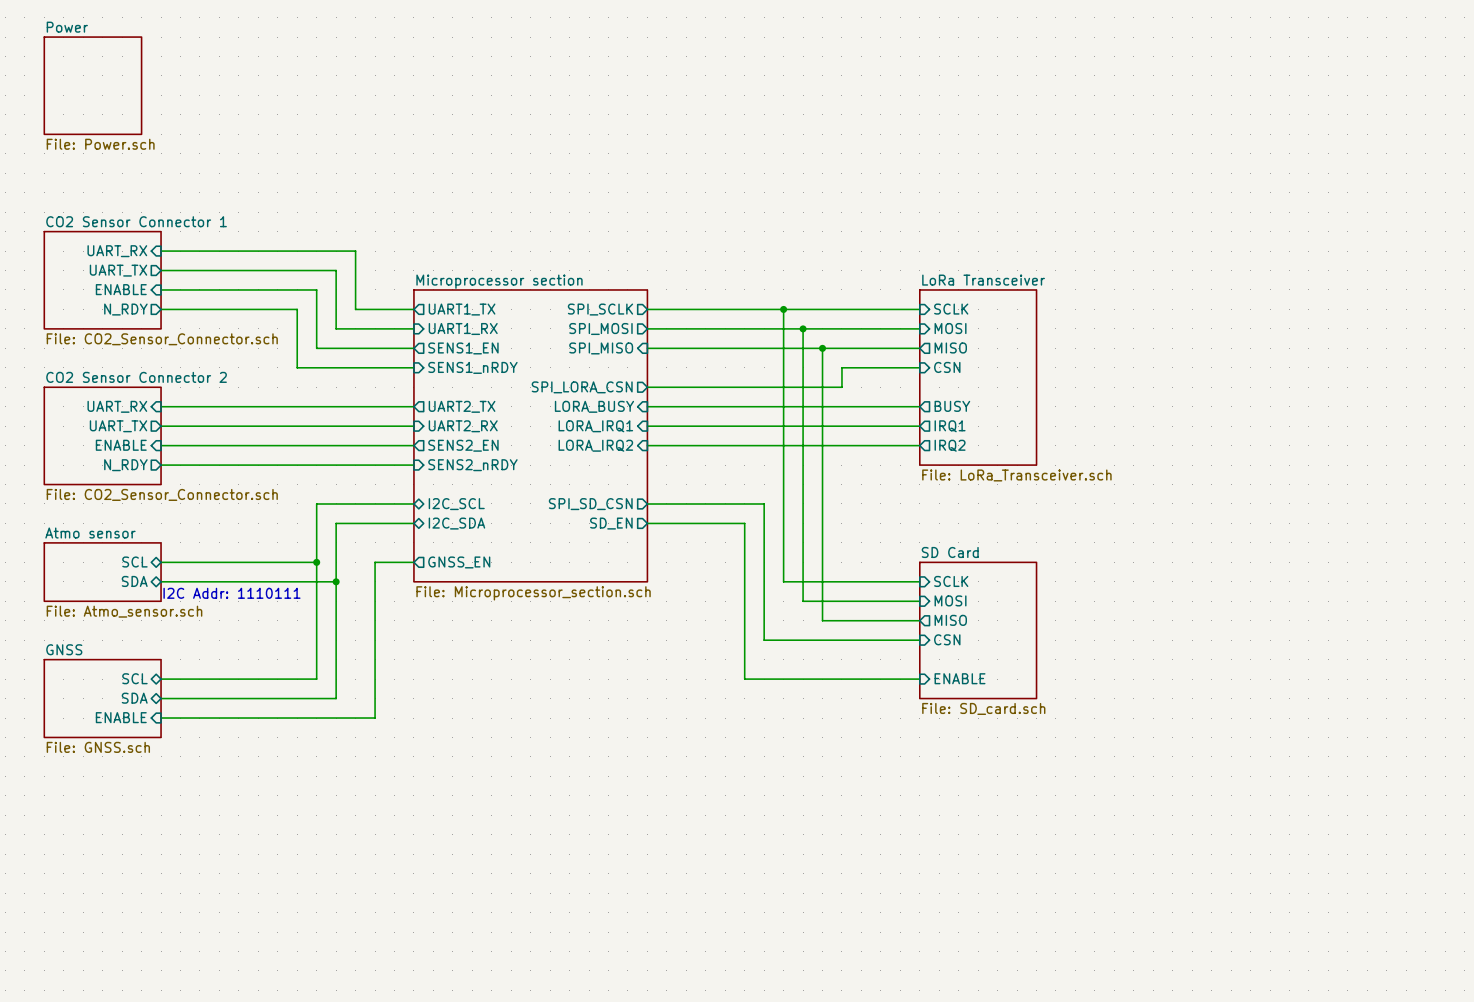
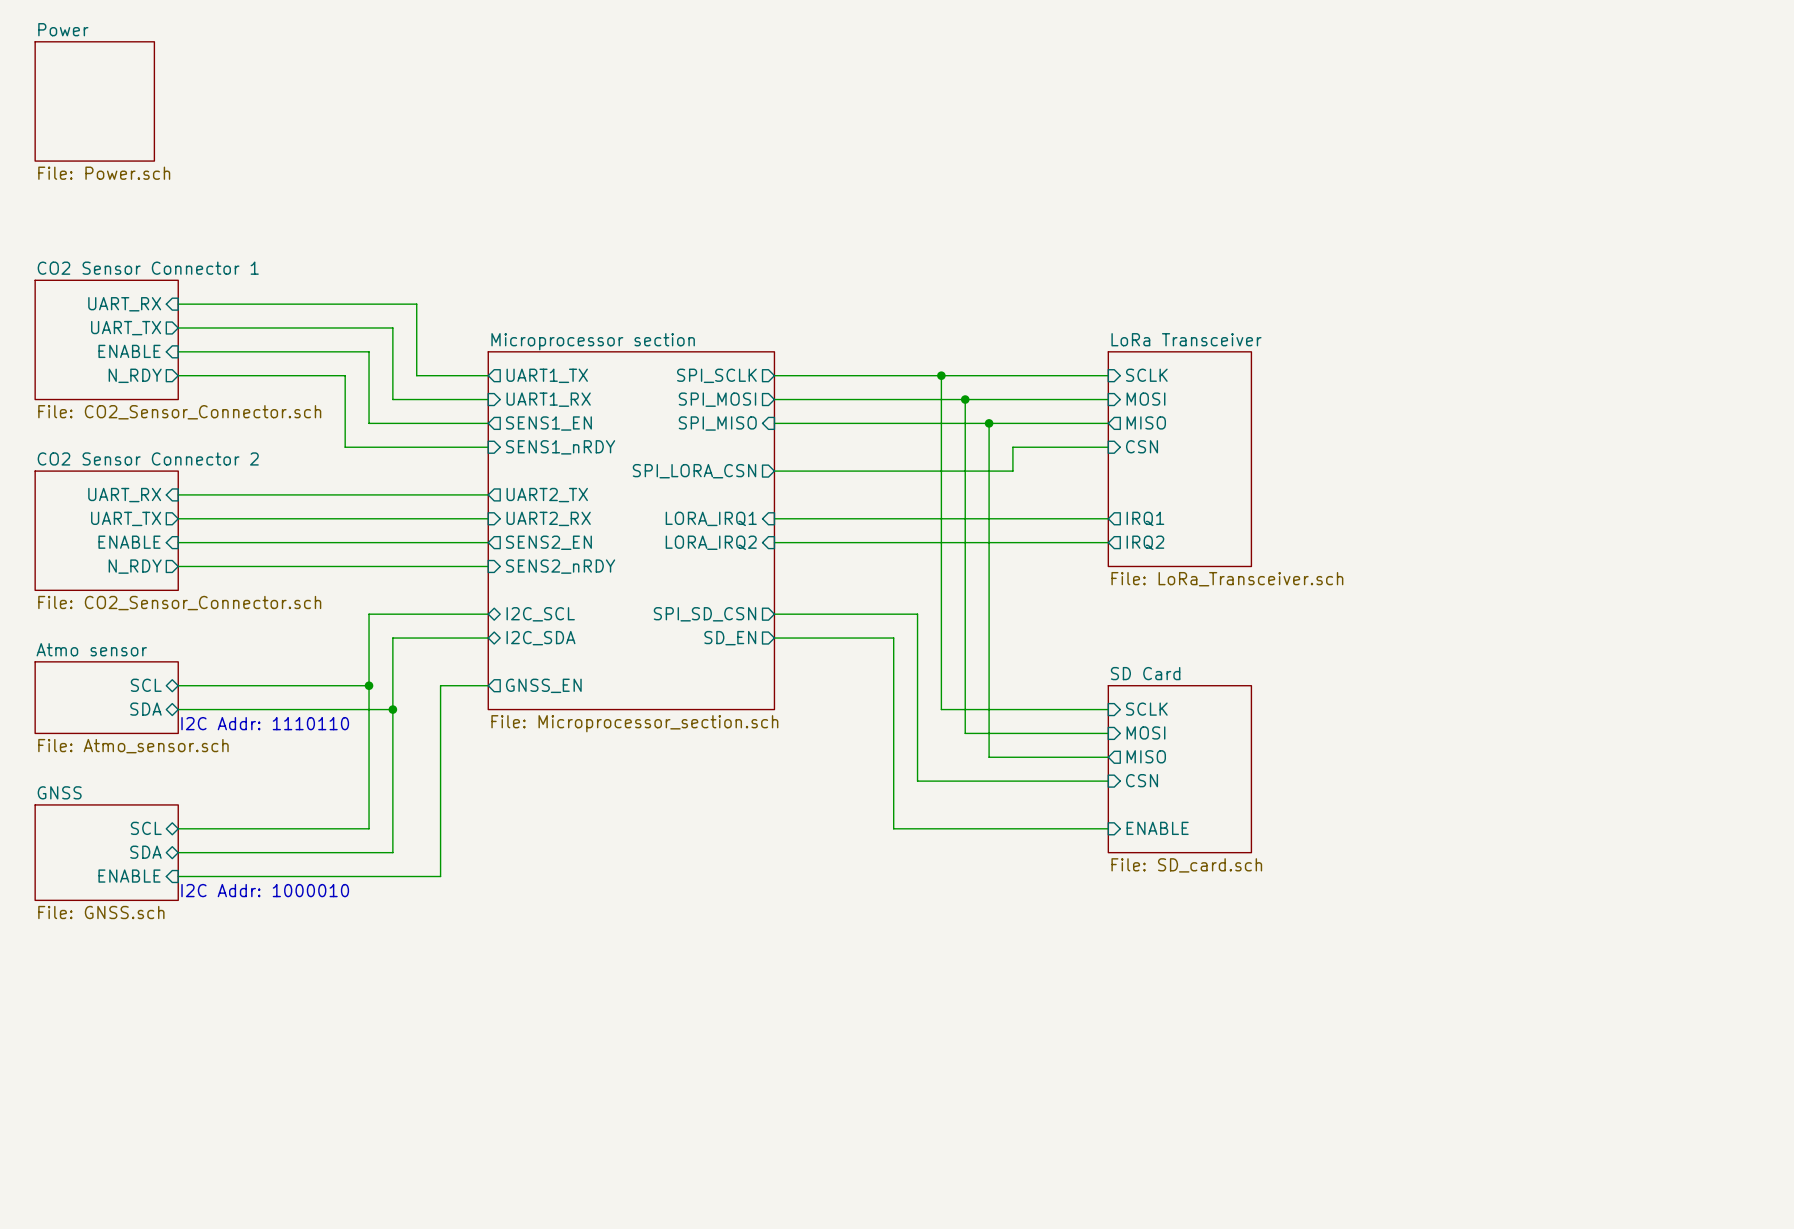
sheet pin: LORA_BUSY (594, 406) -> none
wire: (647, 406) (919, 406) -> none
sheet pin: BUSY (952, 406) -> none
text: I2C Addr: 1110111 (231, 593) -> I2C Addr: 1110110 (265, 723)
text: none -> I2C Addr: 1000010 (265, 890)

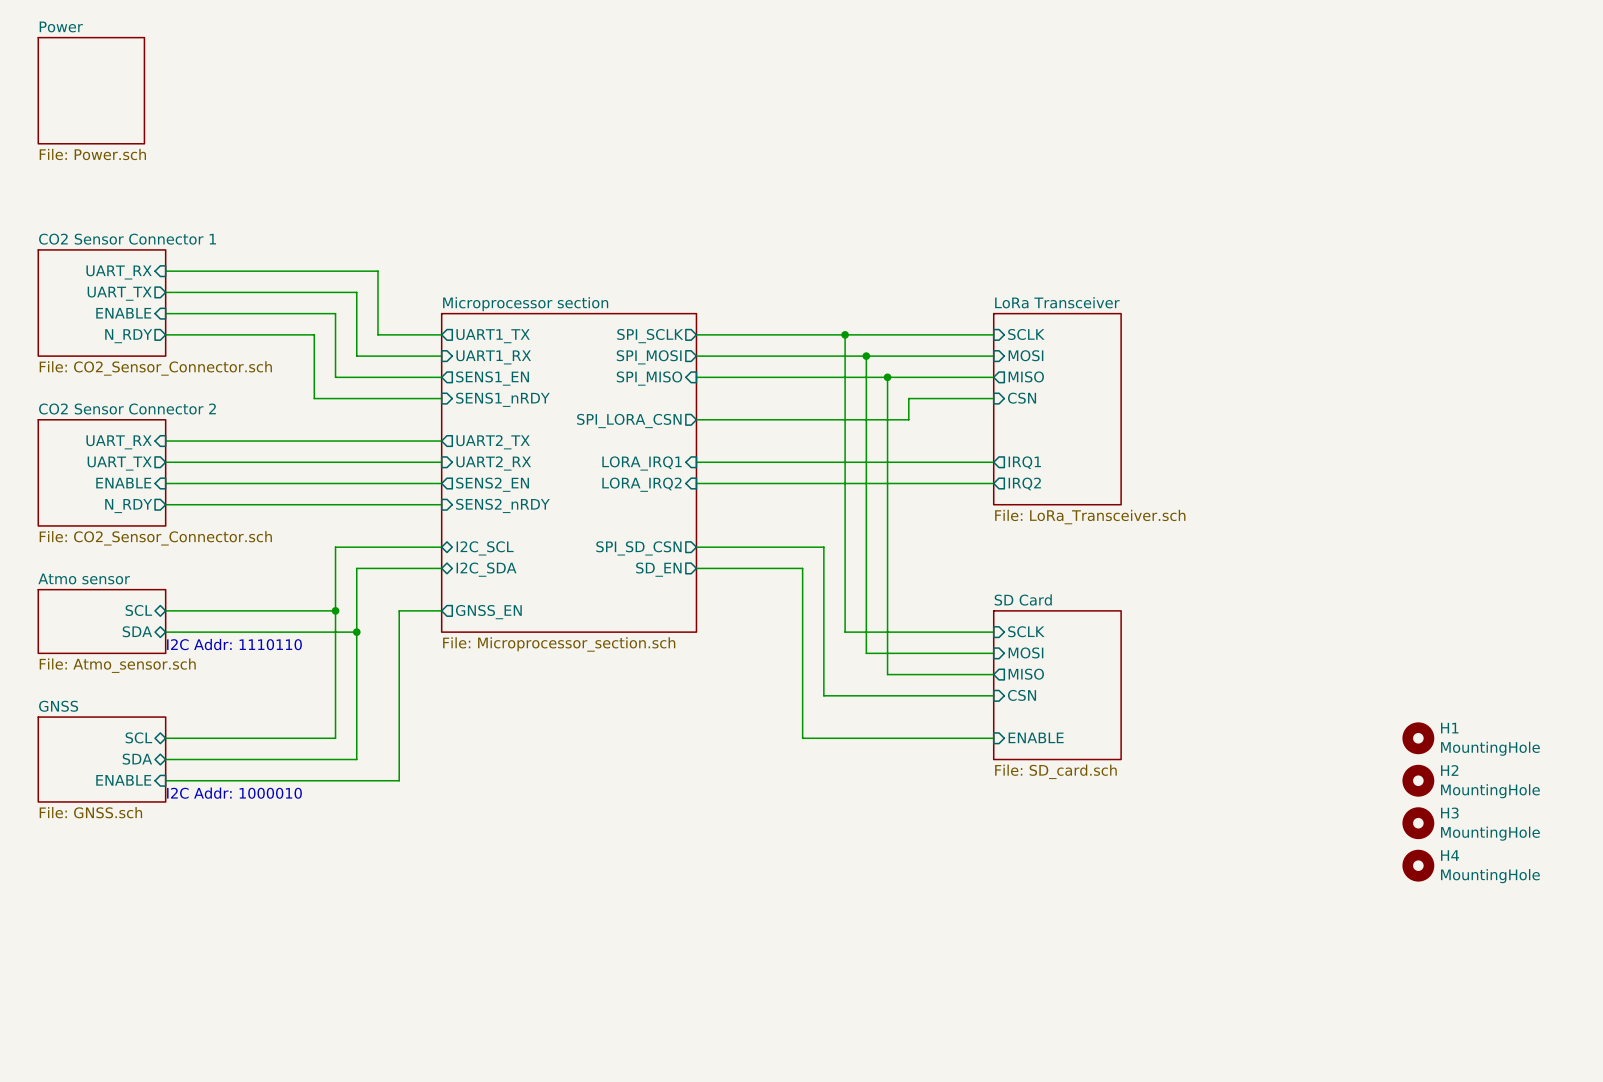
H1: none -> MountingHole (1418, 738)
H2: none -> MountingHole (1418, 780)
H3: none -> MountingHole (1418, 823)
H4: none -> MountingHole (1418, 865)

